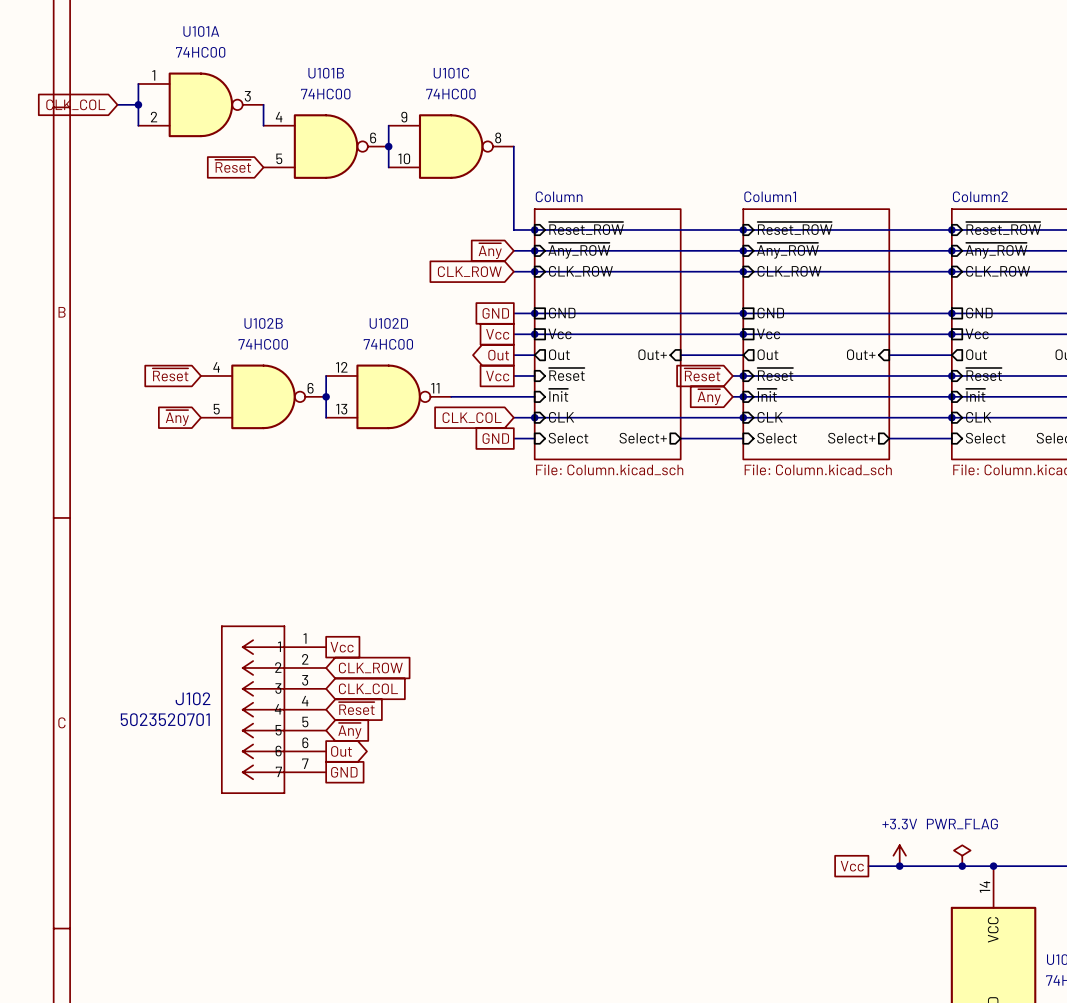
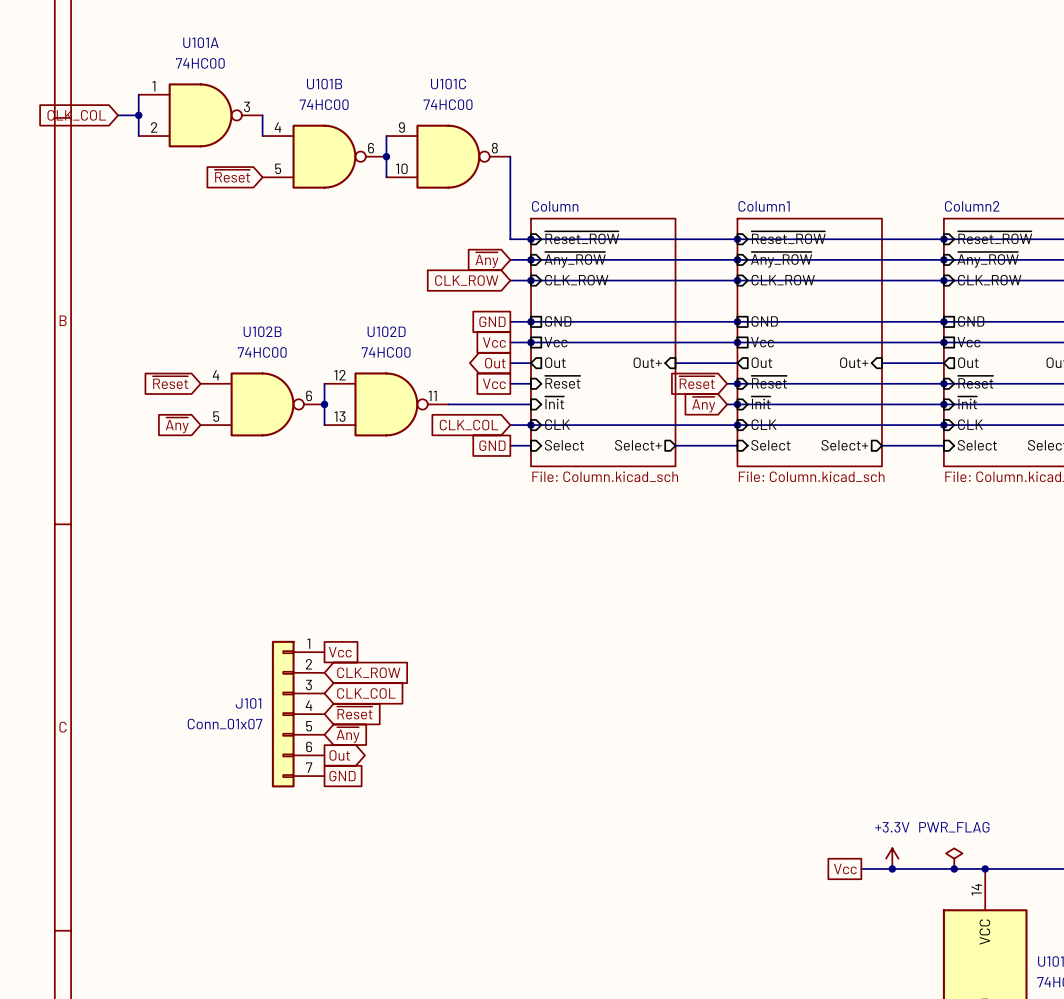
J102: 5023520701 (273, 709) -> none
J101: none -> Conn_01x07 (298, 714)

